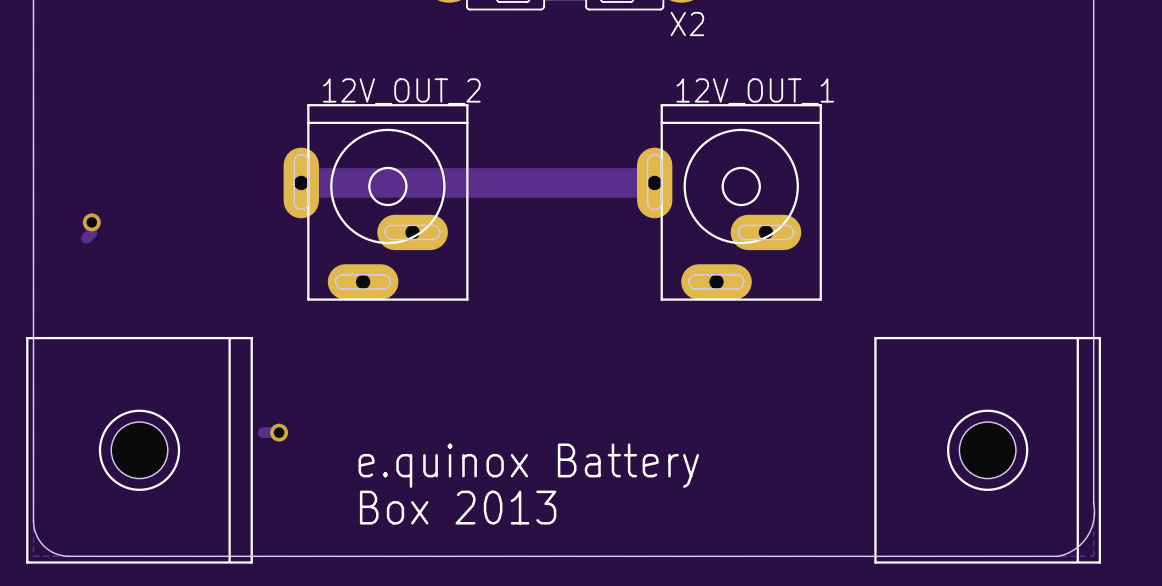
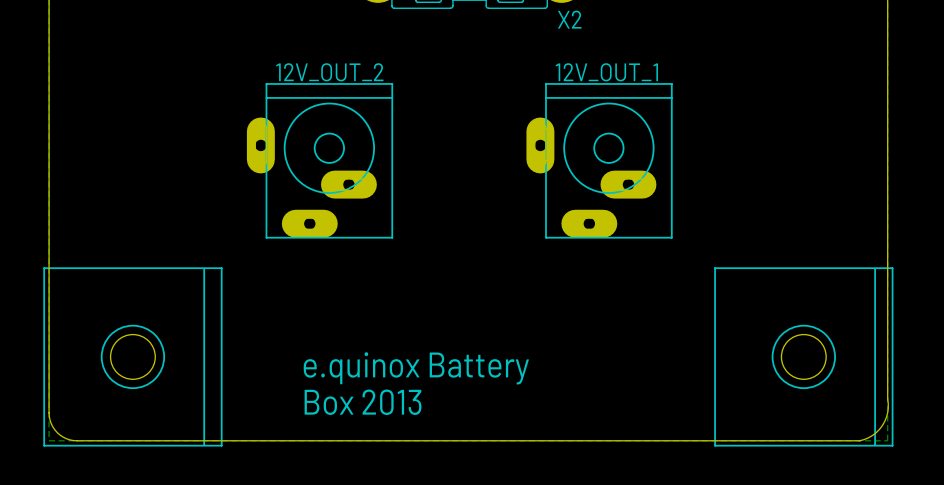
track: (654, 182) (301, 182) -> none
track: (91, 222) (91, 232) (86, 238) -> none
via: (91, 222) -> none
track: (279, 432) (263, 432) -> none
via: (279, 432) -> none

